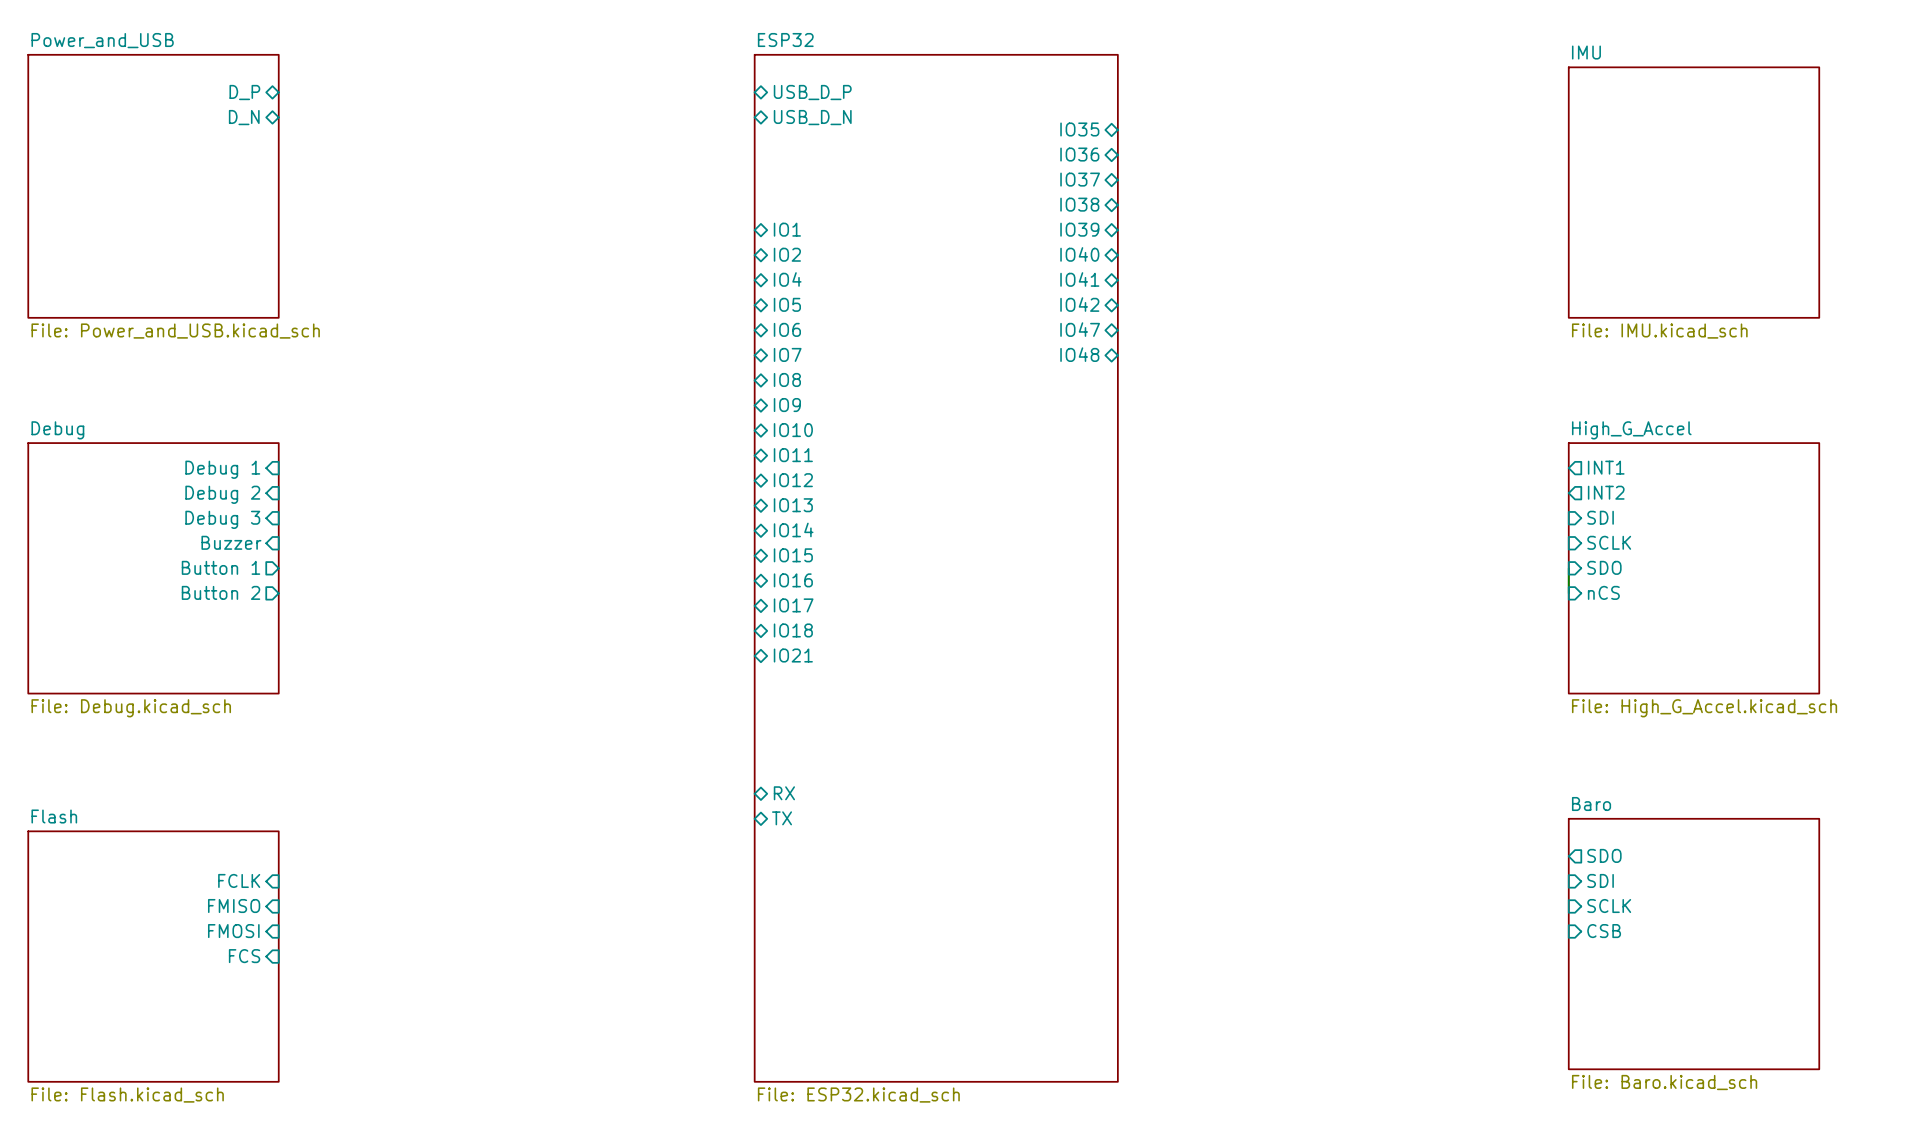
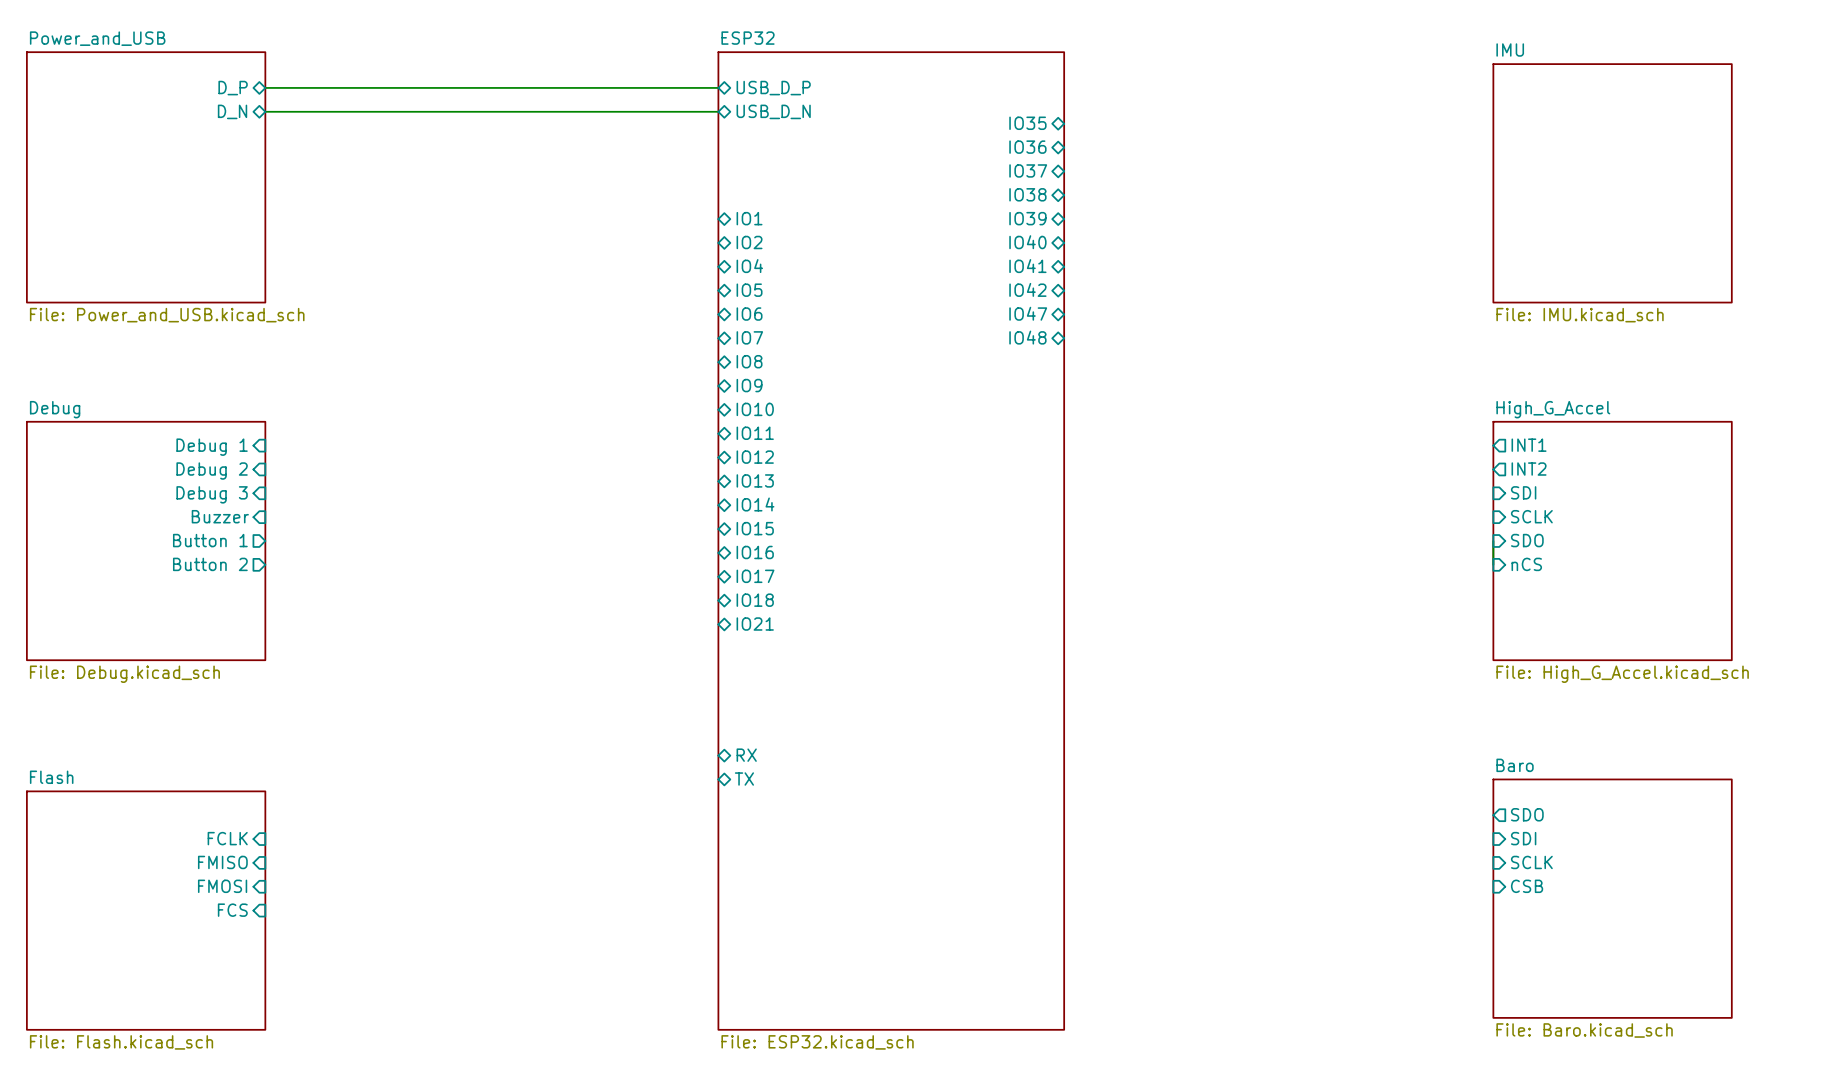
wire: none -> (265, 87) (718, 87)
wire: none -> (265, 111) (718, 111)

